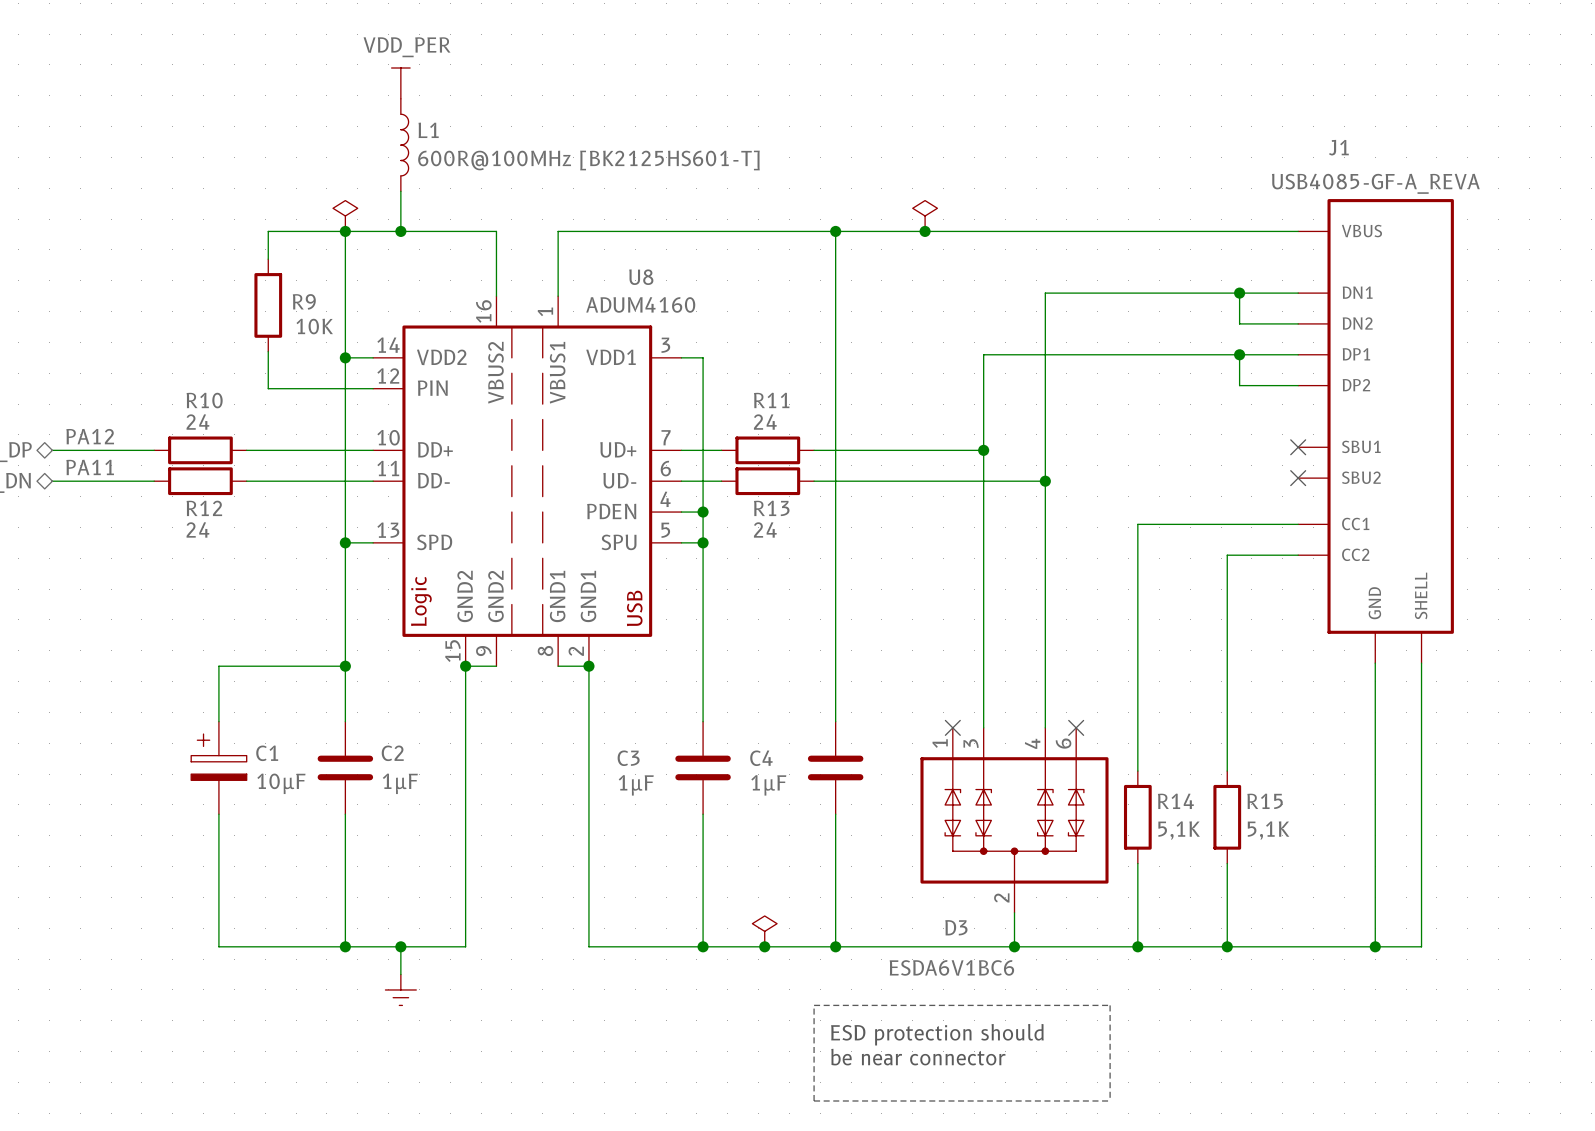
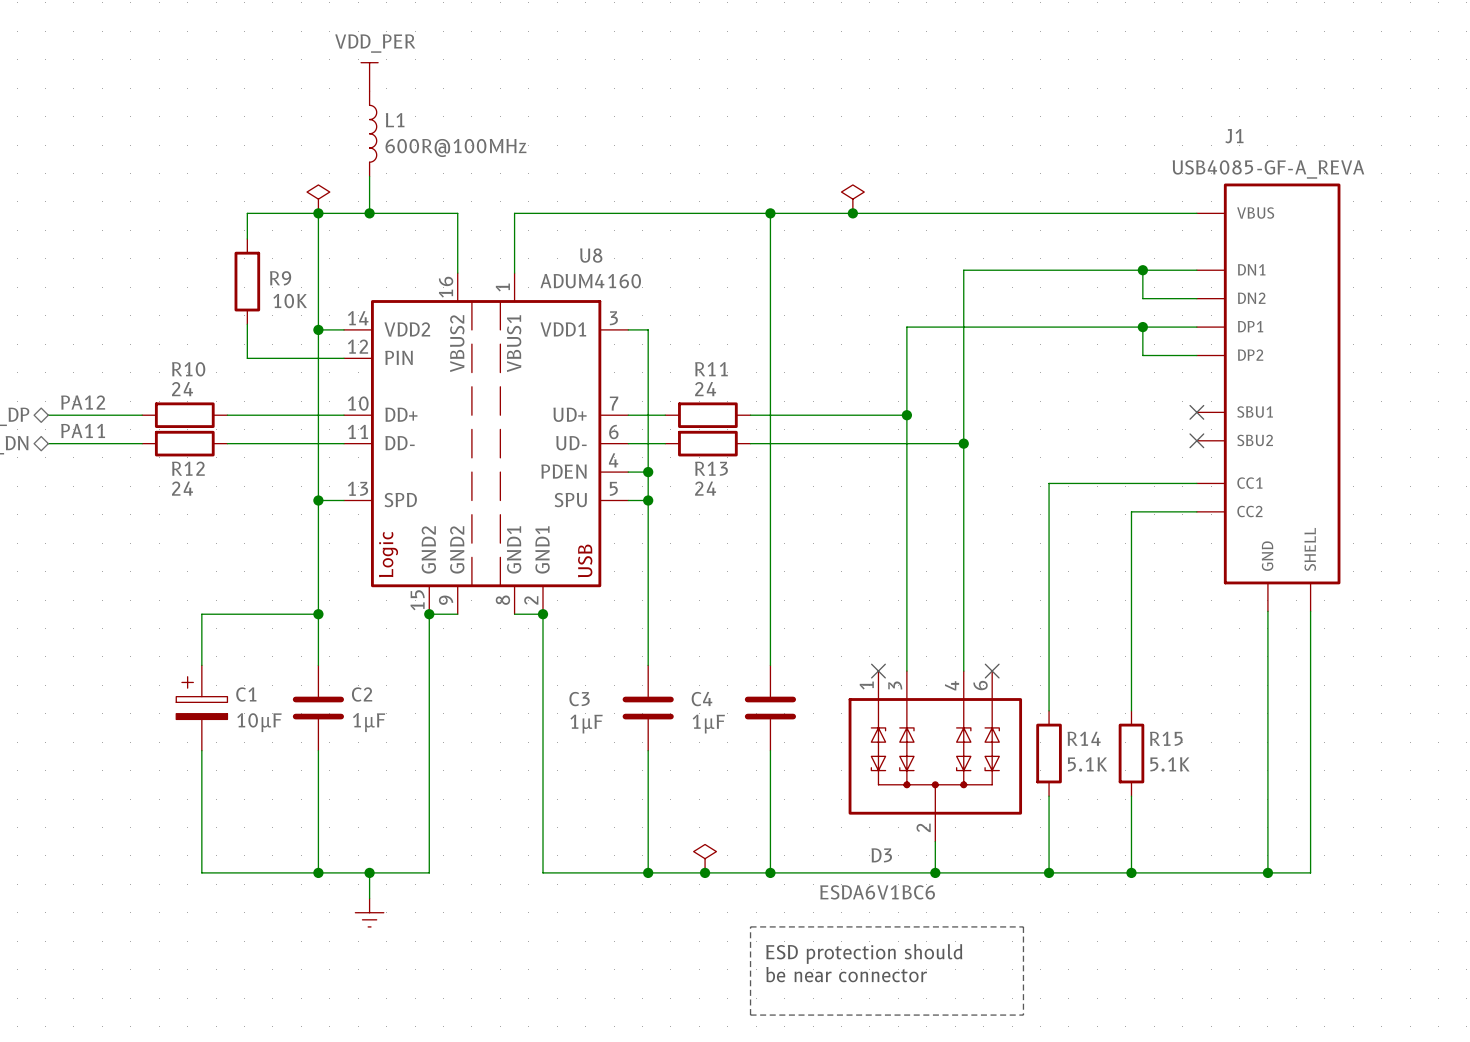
L1 value: 600R@100MHz [BK2125HS601-T] (588, 160) -> 600R@100MHz (456, 147)
R14 value: 5,1K (1179, 830) -> 5.1K (1087, 764)
R15 value: 5,1K (1268, 830) -> 5.1K (1170, 764)

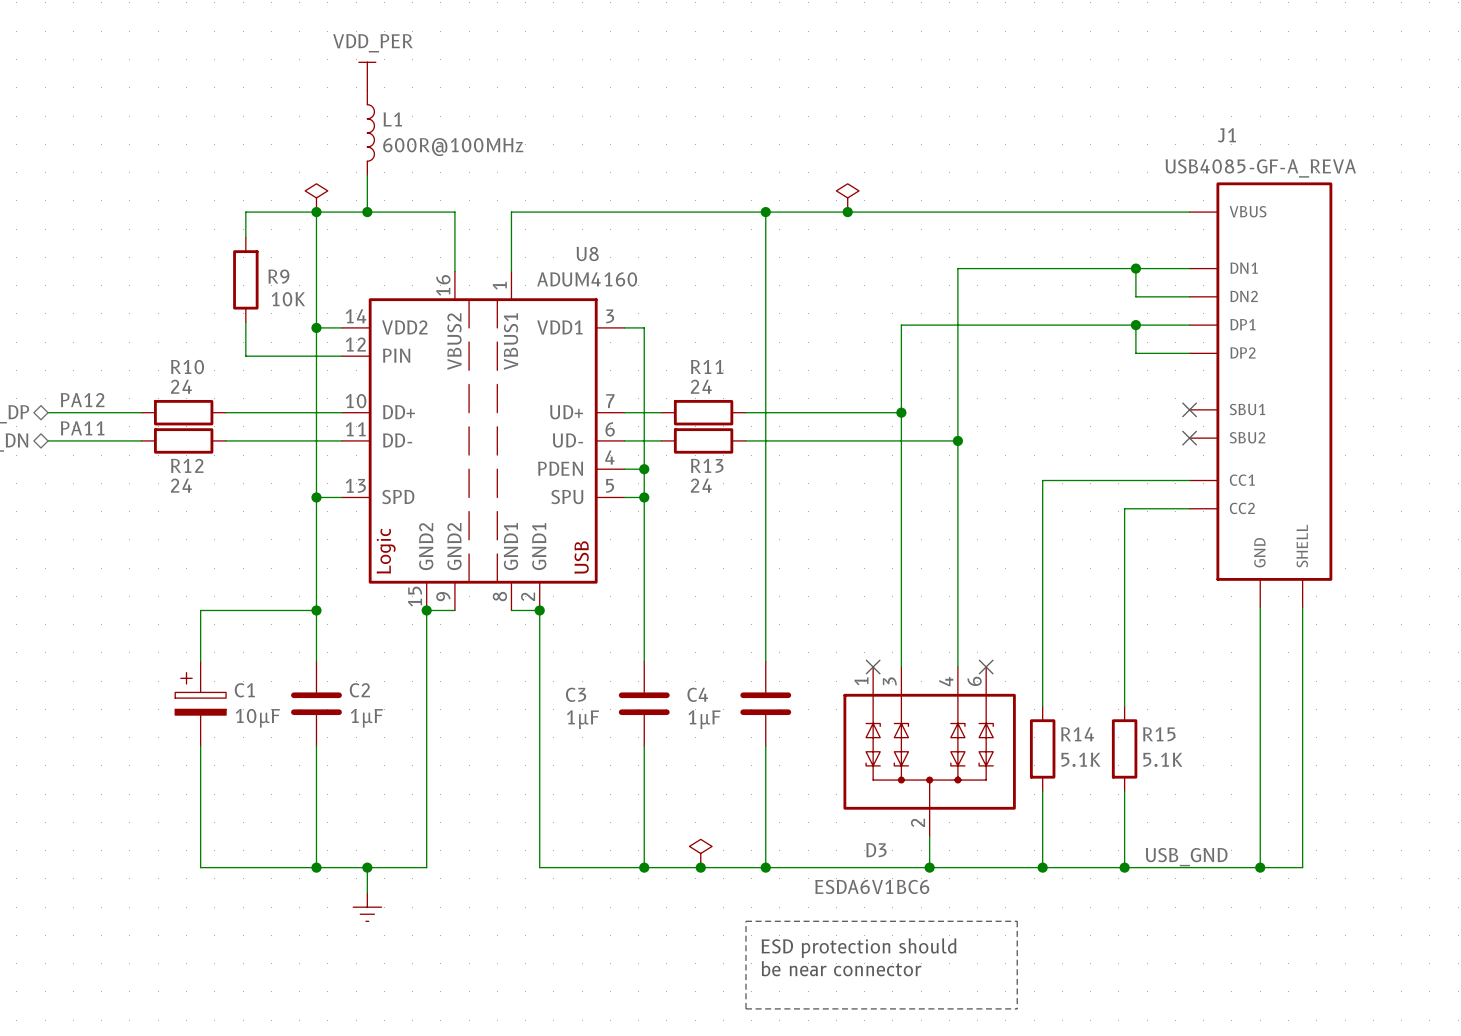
label: none -> USB_GND (1186, 857)

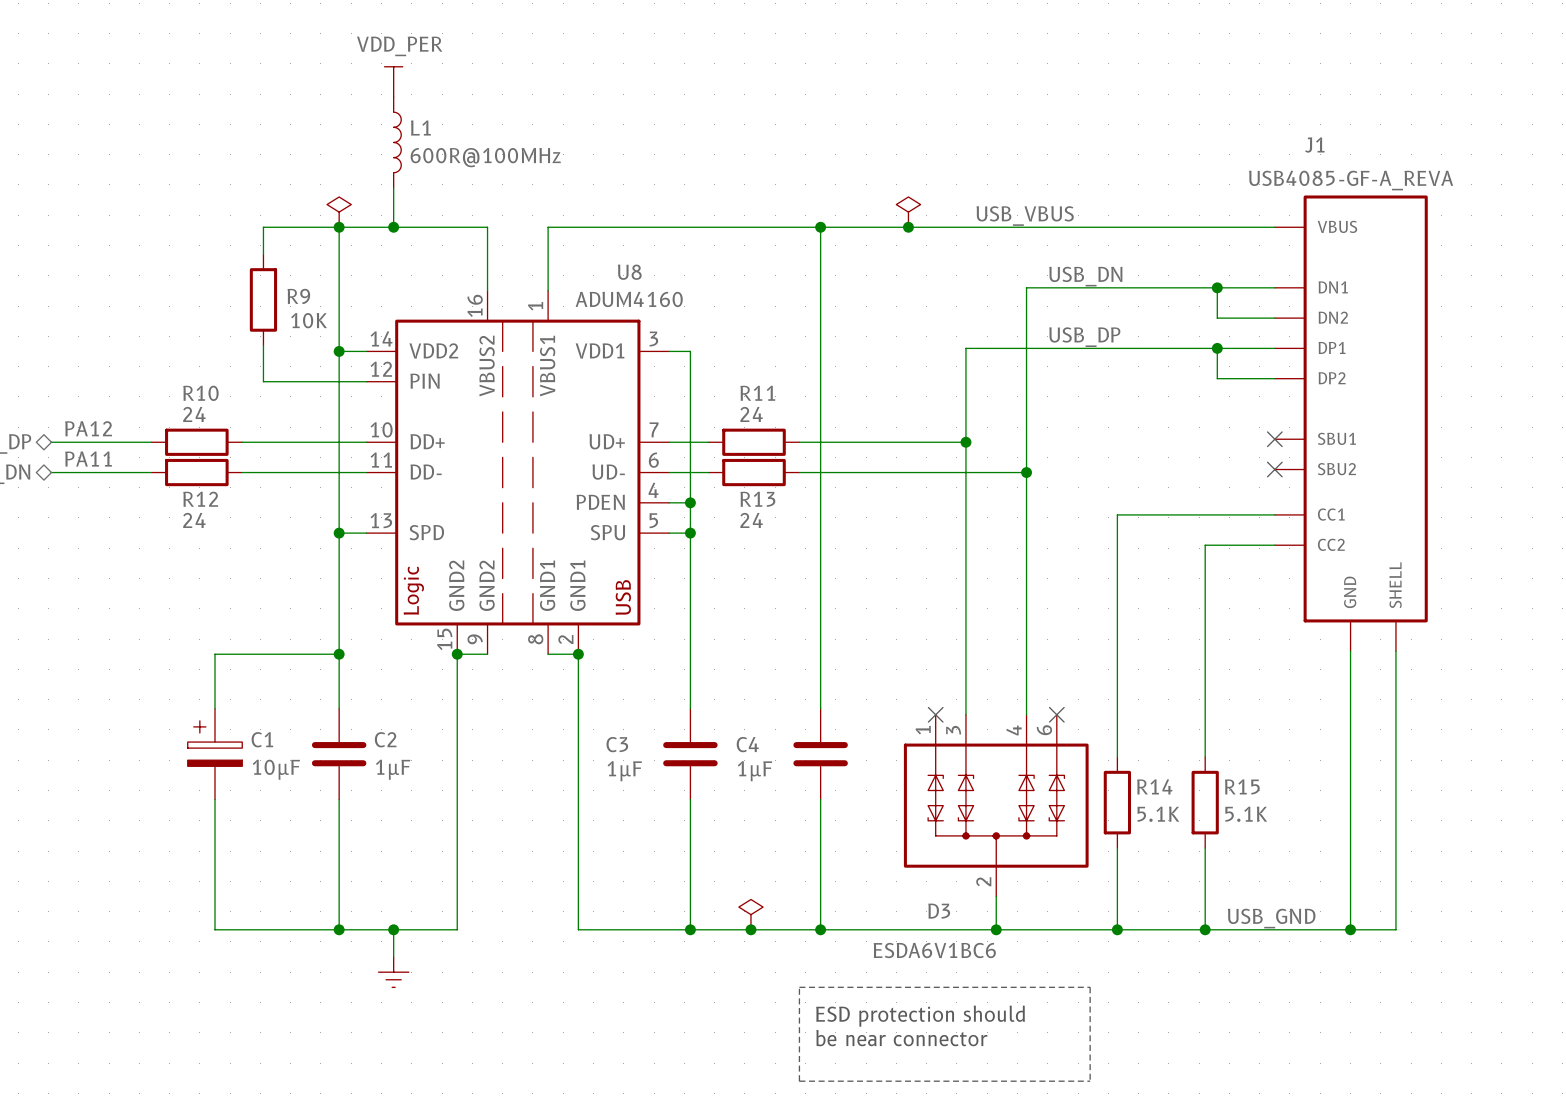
label: none -> USB_VBUS (1025, 216)
label: none -> USB_DN (1085, 276)
label: none -> USB_DP (1084, 337)

